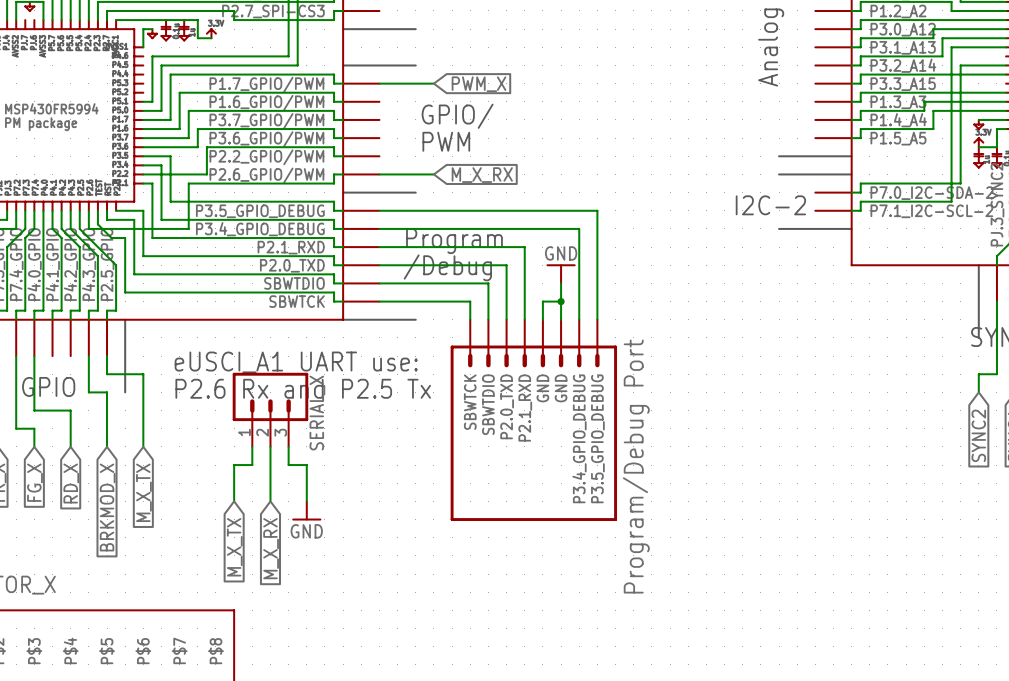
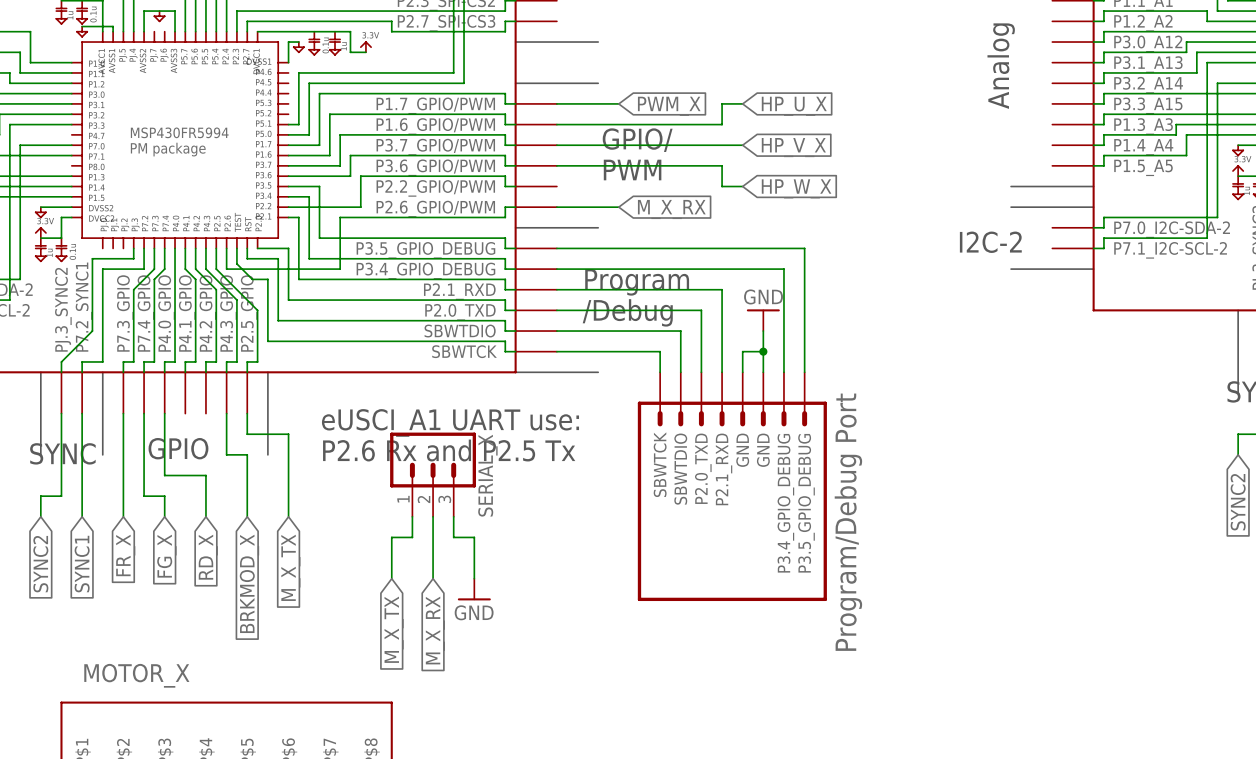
wire: none -> (742, 103) (722, 103) (722, 124) (556, 124)
global label: none -> HP_U_X (794, 106)
wire: none -> (556, 145) (742, 145)
global label: none -> HP_V_X (793, 147)
wire: none -> (556, 165) (722, 165) (722, 186) (742, 186)
global label: none -> HP_W_X (796, 188)

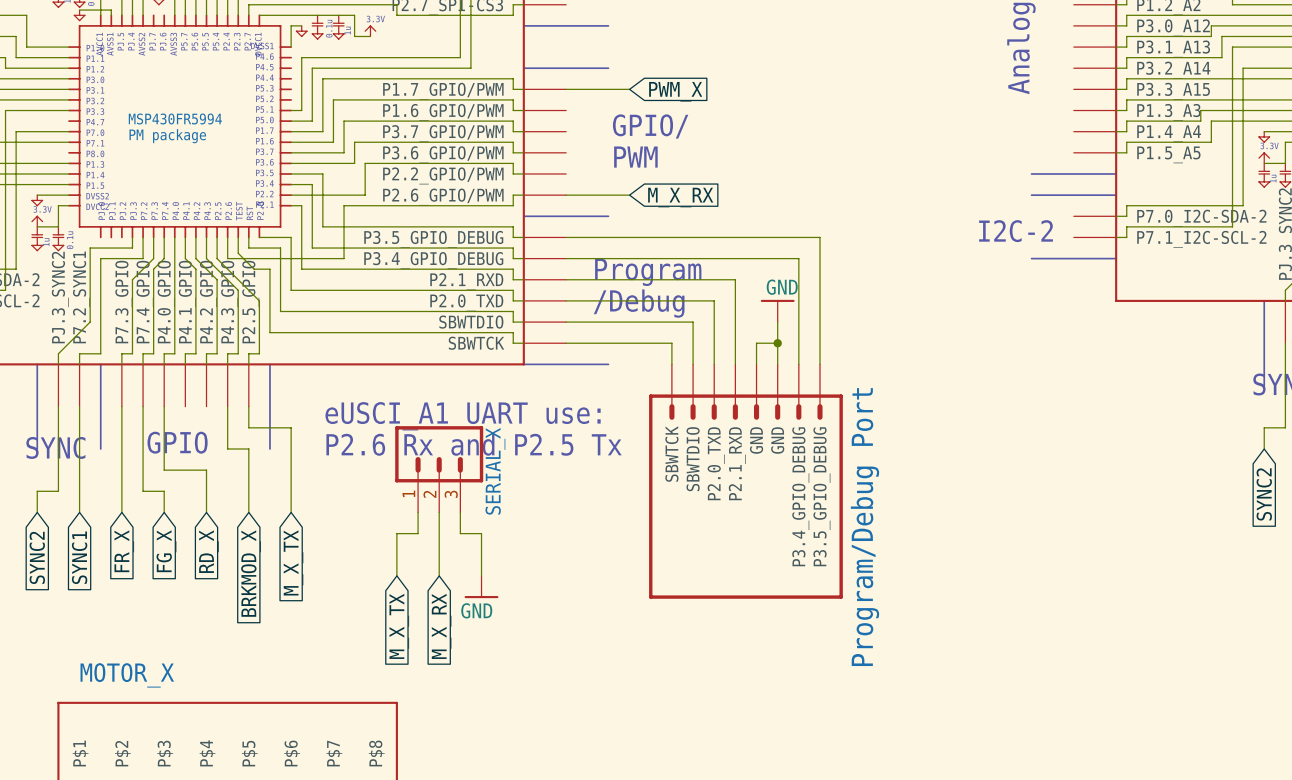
wire: (742, 103) (722, 103) (722, 124) (556, 124) -> none
global label: HP_U_X (794, 106) -> none
wire: (556, 145) (742, 145) -> none
global label: HP_V_X (793, 147) -> none
wire: (556, 165) (722, 165) (722, 186) (742, 186) -> none
global label: HP_W_X (796, 188) -> none

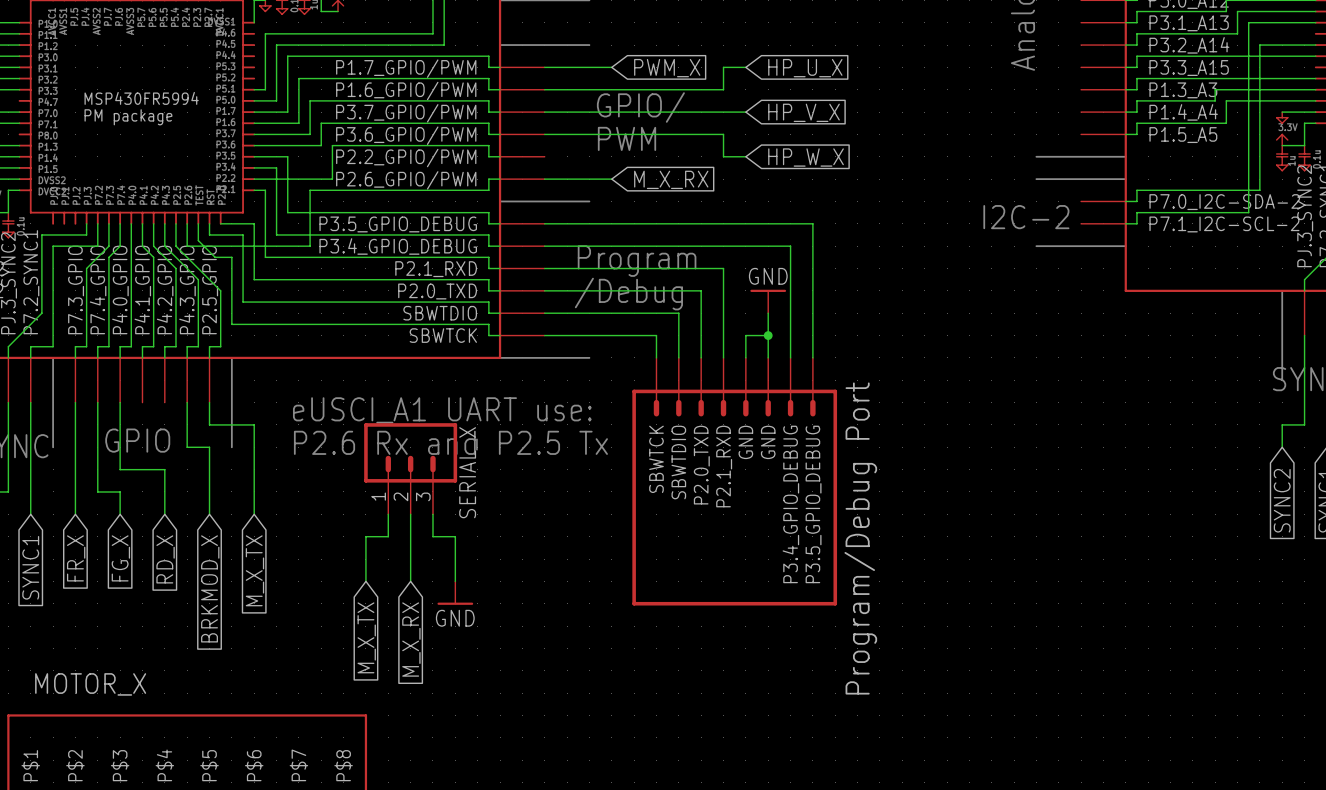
wire: none -> (745, 67) (723, 67) (723, 89) (544, 89)
global label: none -> HP_U_X (805, 68)
wire: none -> (544, 112) (745, 112)
global label: none -> HP_V_X (804, 112)
wire: none -> (544, 134) (723, 134) (723, 156) (745, 156)
global label: none -> HP_W_X (806, 157)

